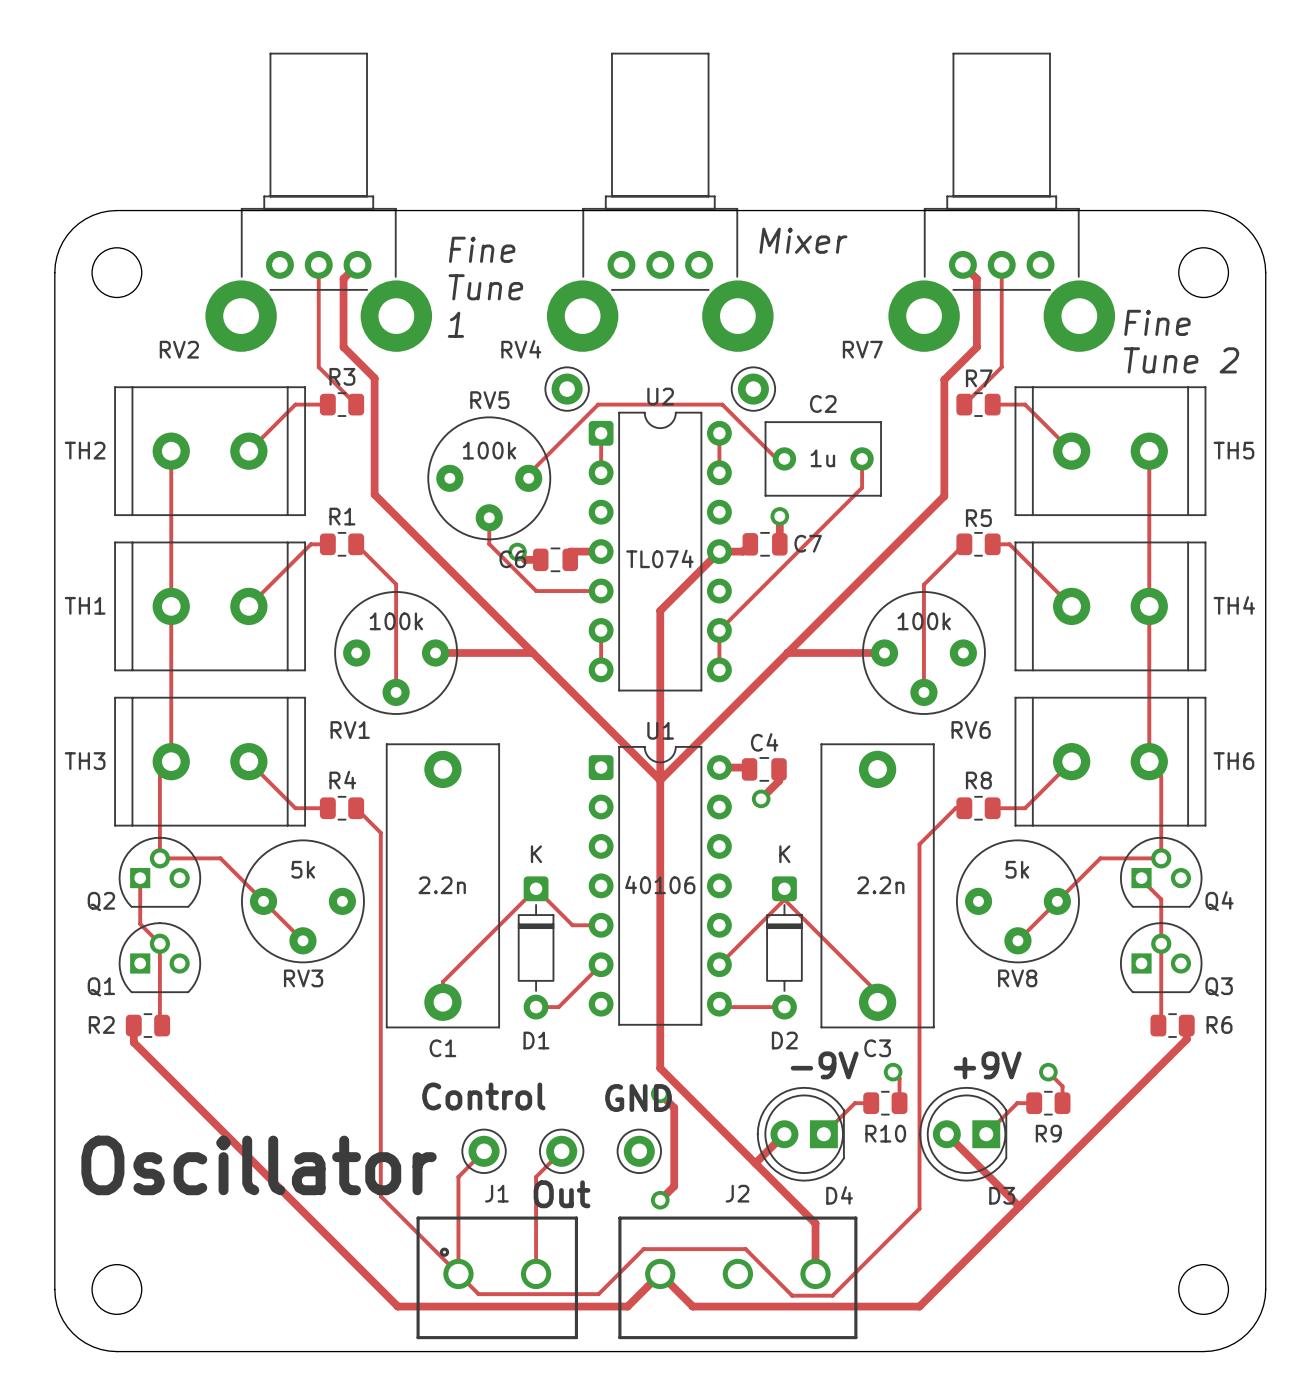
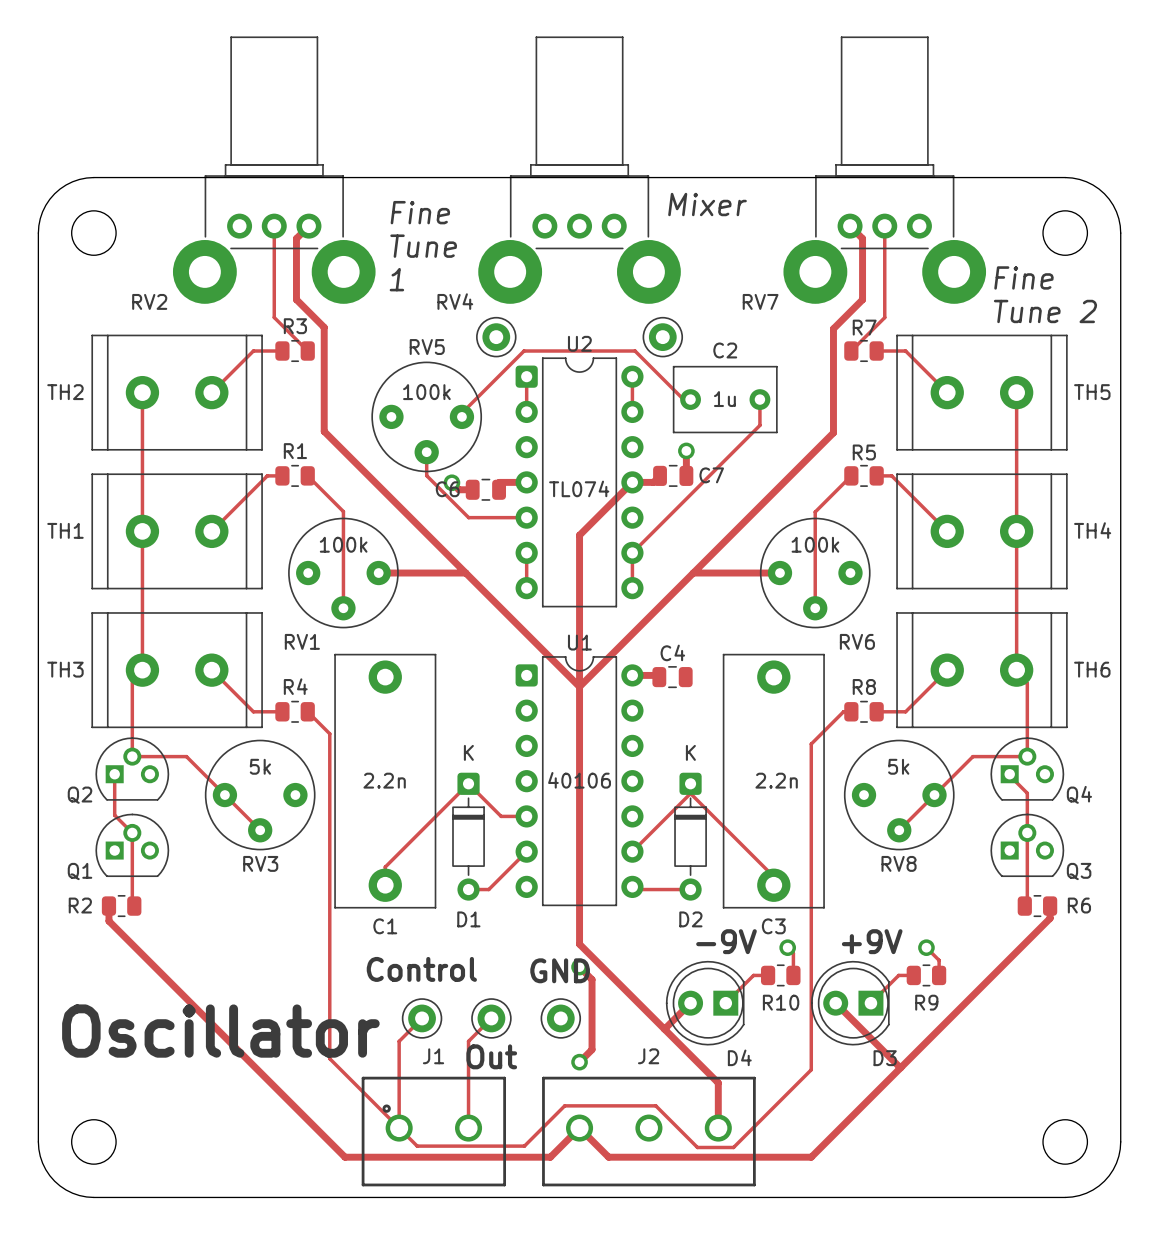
track: (779, 769) (779, 781) (761, 798) -> none
via: (761, 798) -> none

